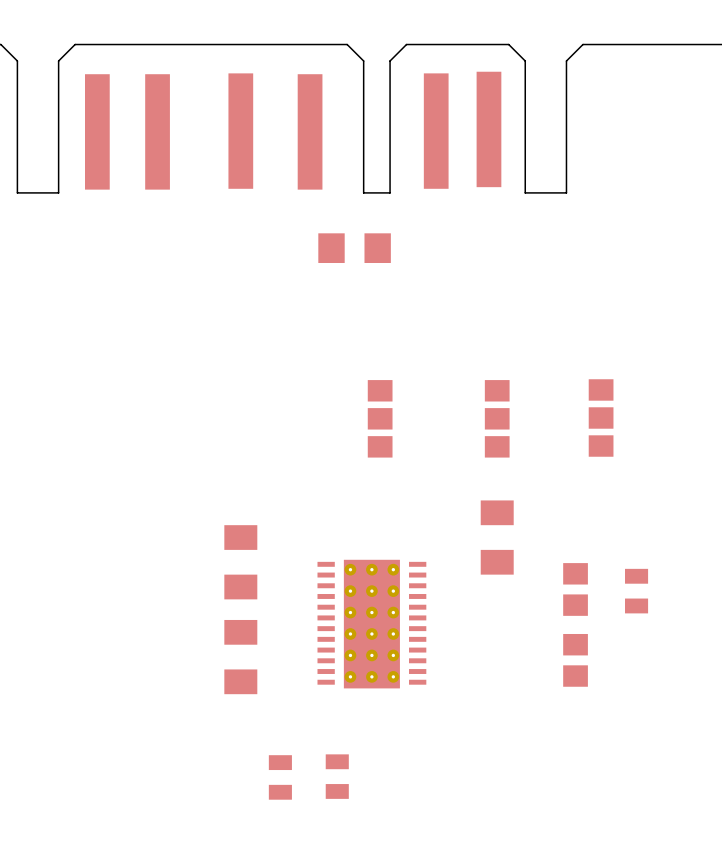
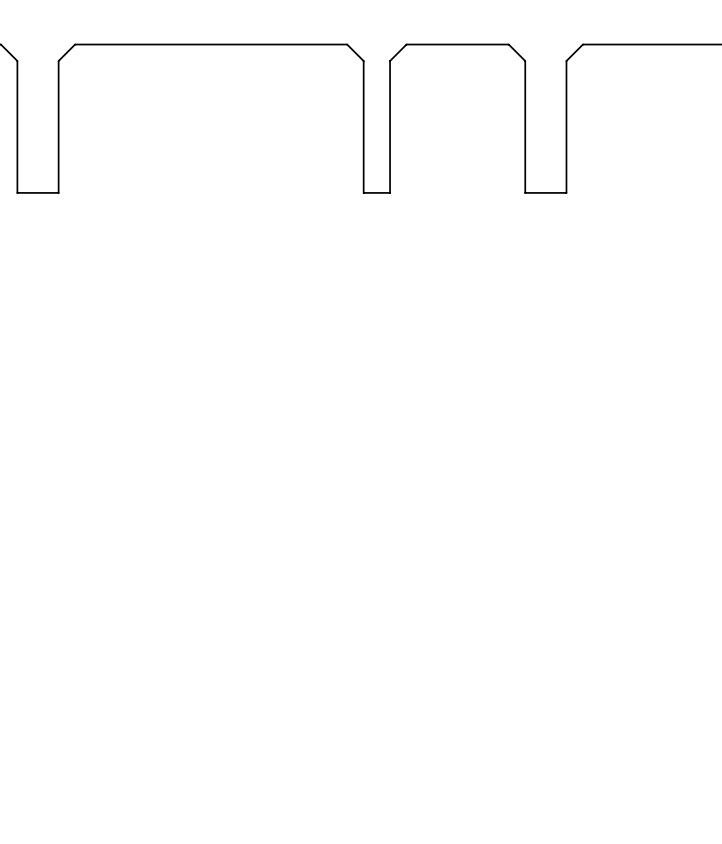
part: (488, 129) -> none
part: (97, 131) -> none
part: (157, 131) -> none
part: (240, 131) -> none
part: (310, 131) -> none
part: (436, 131) -> none
part: (354, 248) -> none
part: (601, 417) -> none
part: (380, 418) -> none
part: (497, 418) -> none
part: (497, 537) -> none
part: (240, 562) -> none
part: (575, 589) -> none
part: (636, 591) -> none
part: (371, 624) -> none
part: (240, 657) -> none
part: (575, 660) -> none
part: (337, 776) -> none
part: (280, 777) -> none

